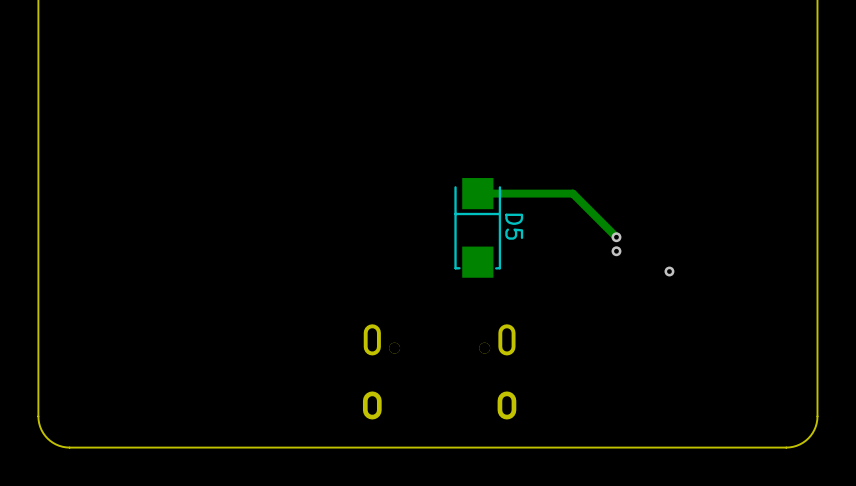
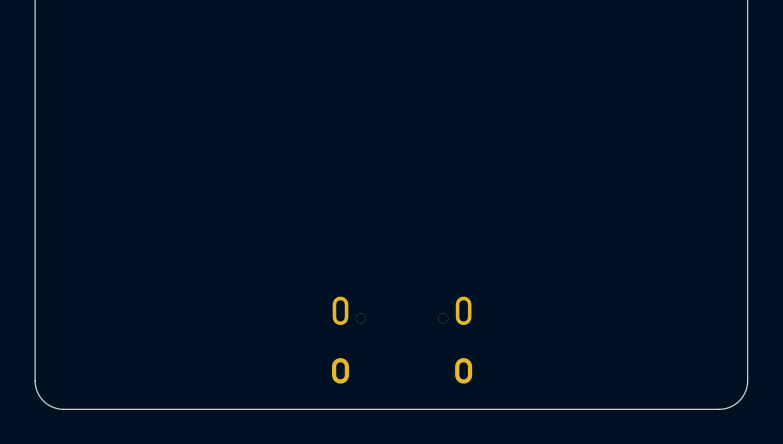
track: (477, 193) (572, 193) (616, 237) -> none
D5: (477, 227) -> none
via: (616, 237) -> none
via: (616, 251) -> none
via: (669, 271) -> none

